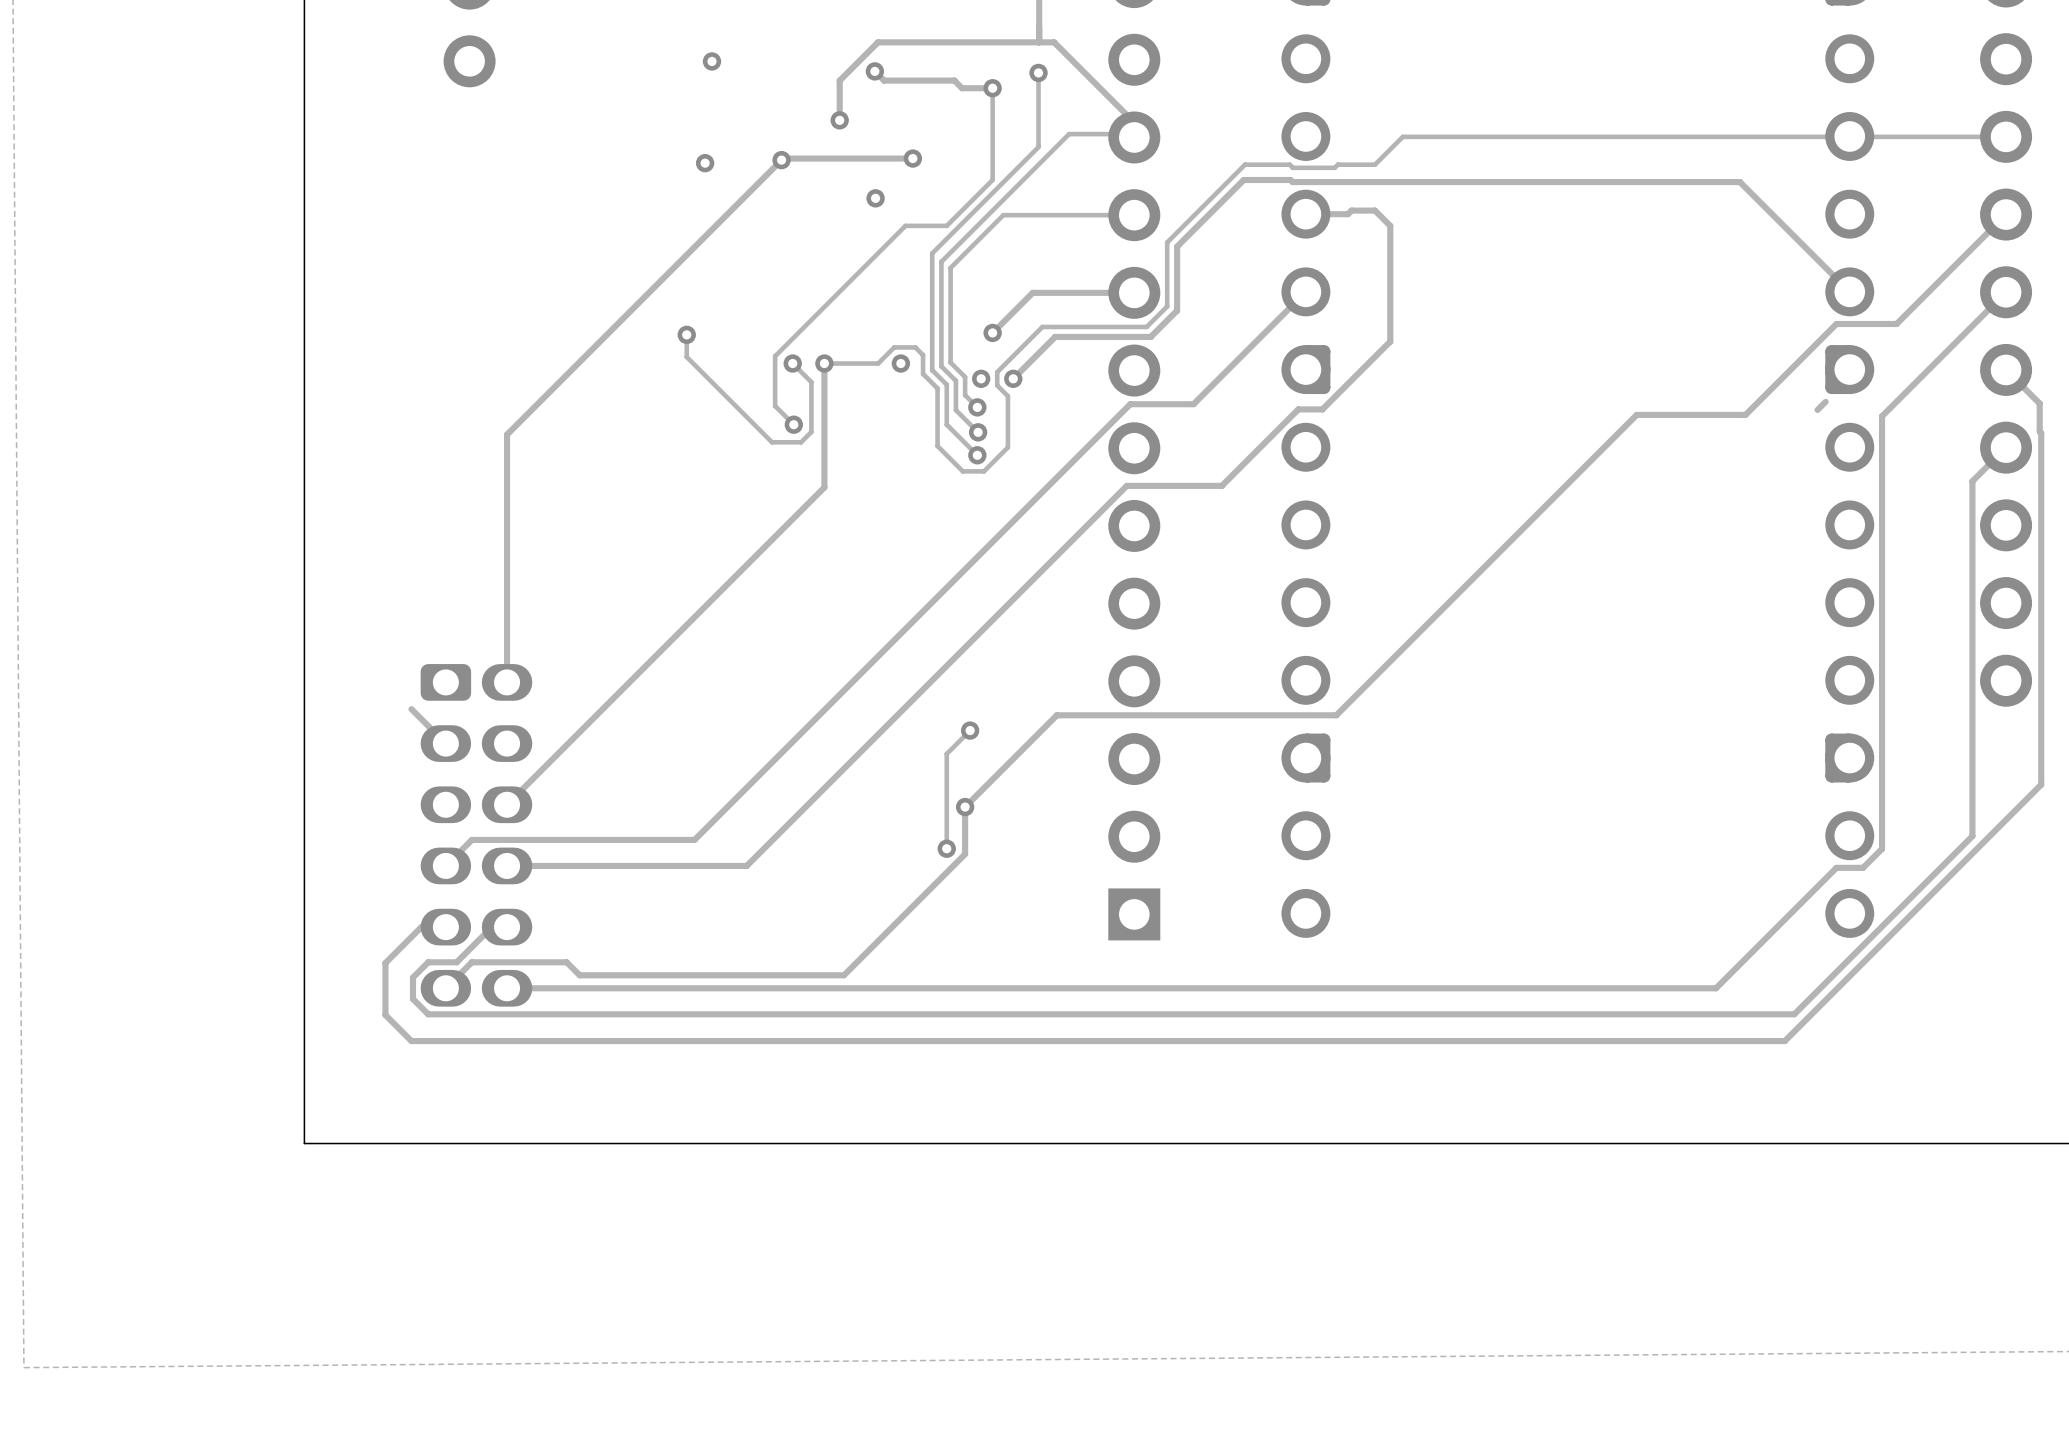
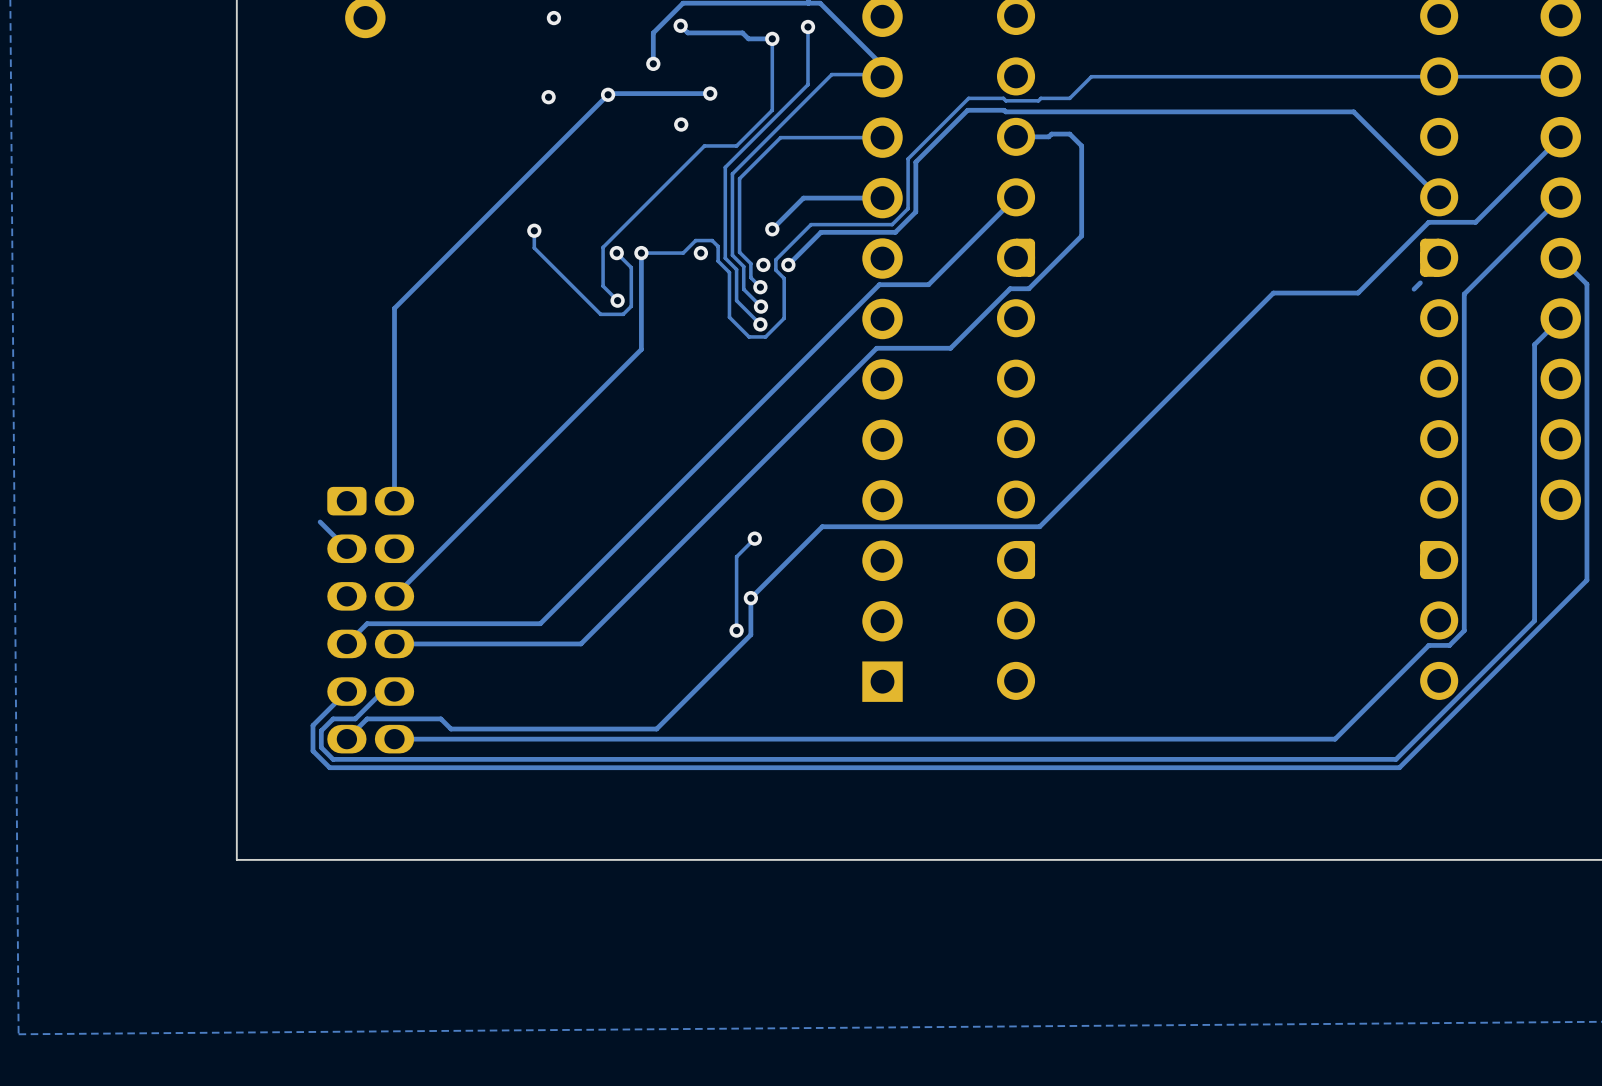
track: (2039, 431) (2041, 433) (2041, 784) (1784, 1041) (411, 1041) (385, 1015) (385, 963) (421, 927) (445, 927) -> (1586, 305) (1586, 580) (1399, 767) (329, 767) (312, 750) (312, 725) (346, 691)

